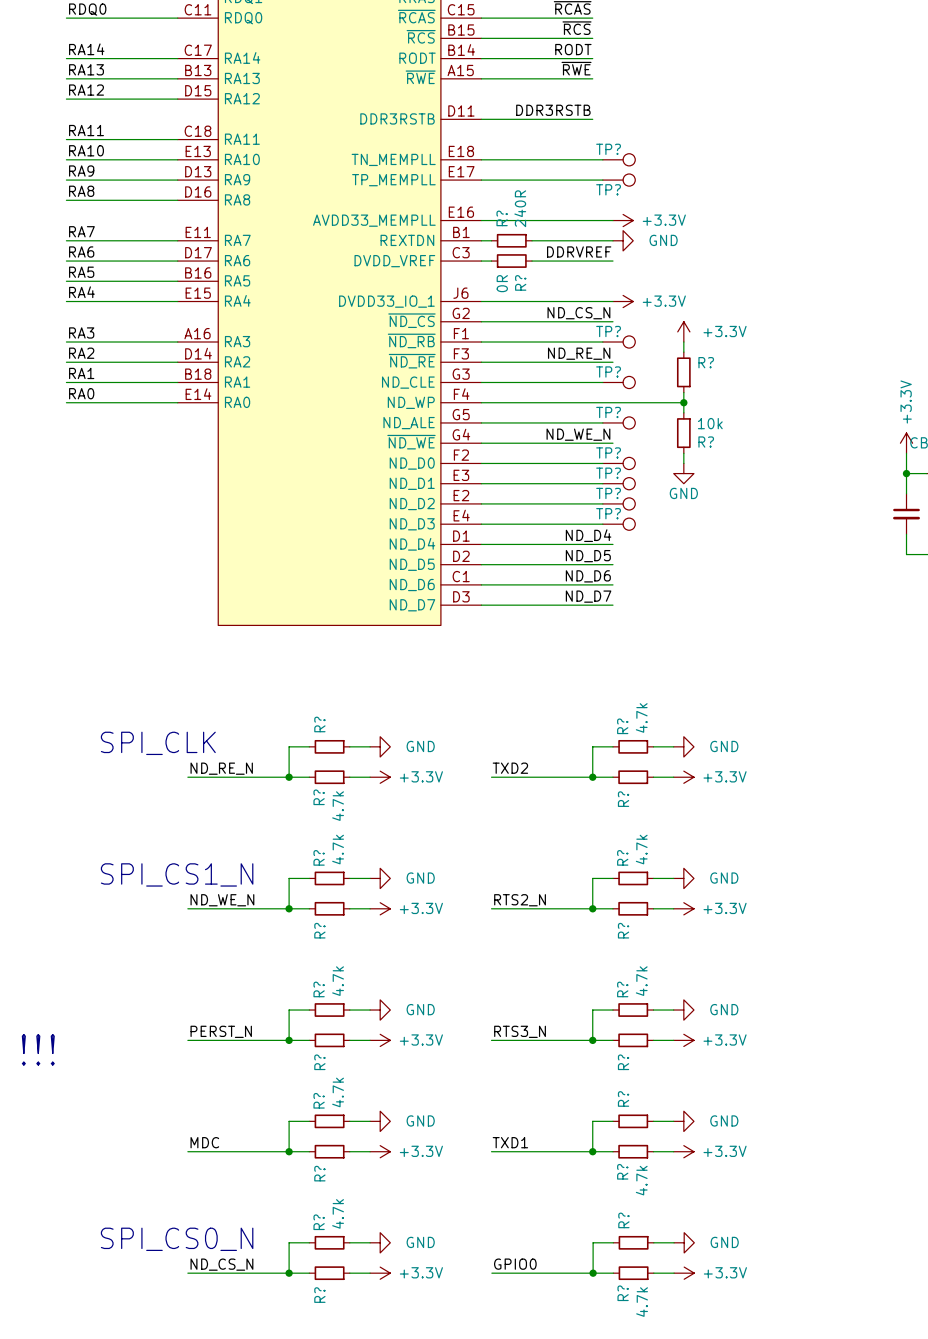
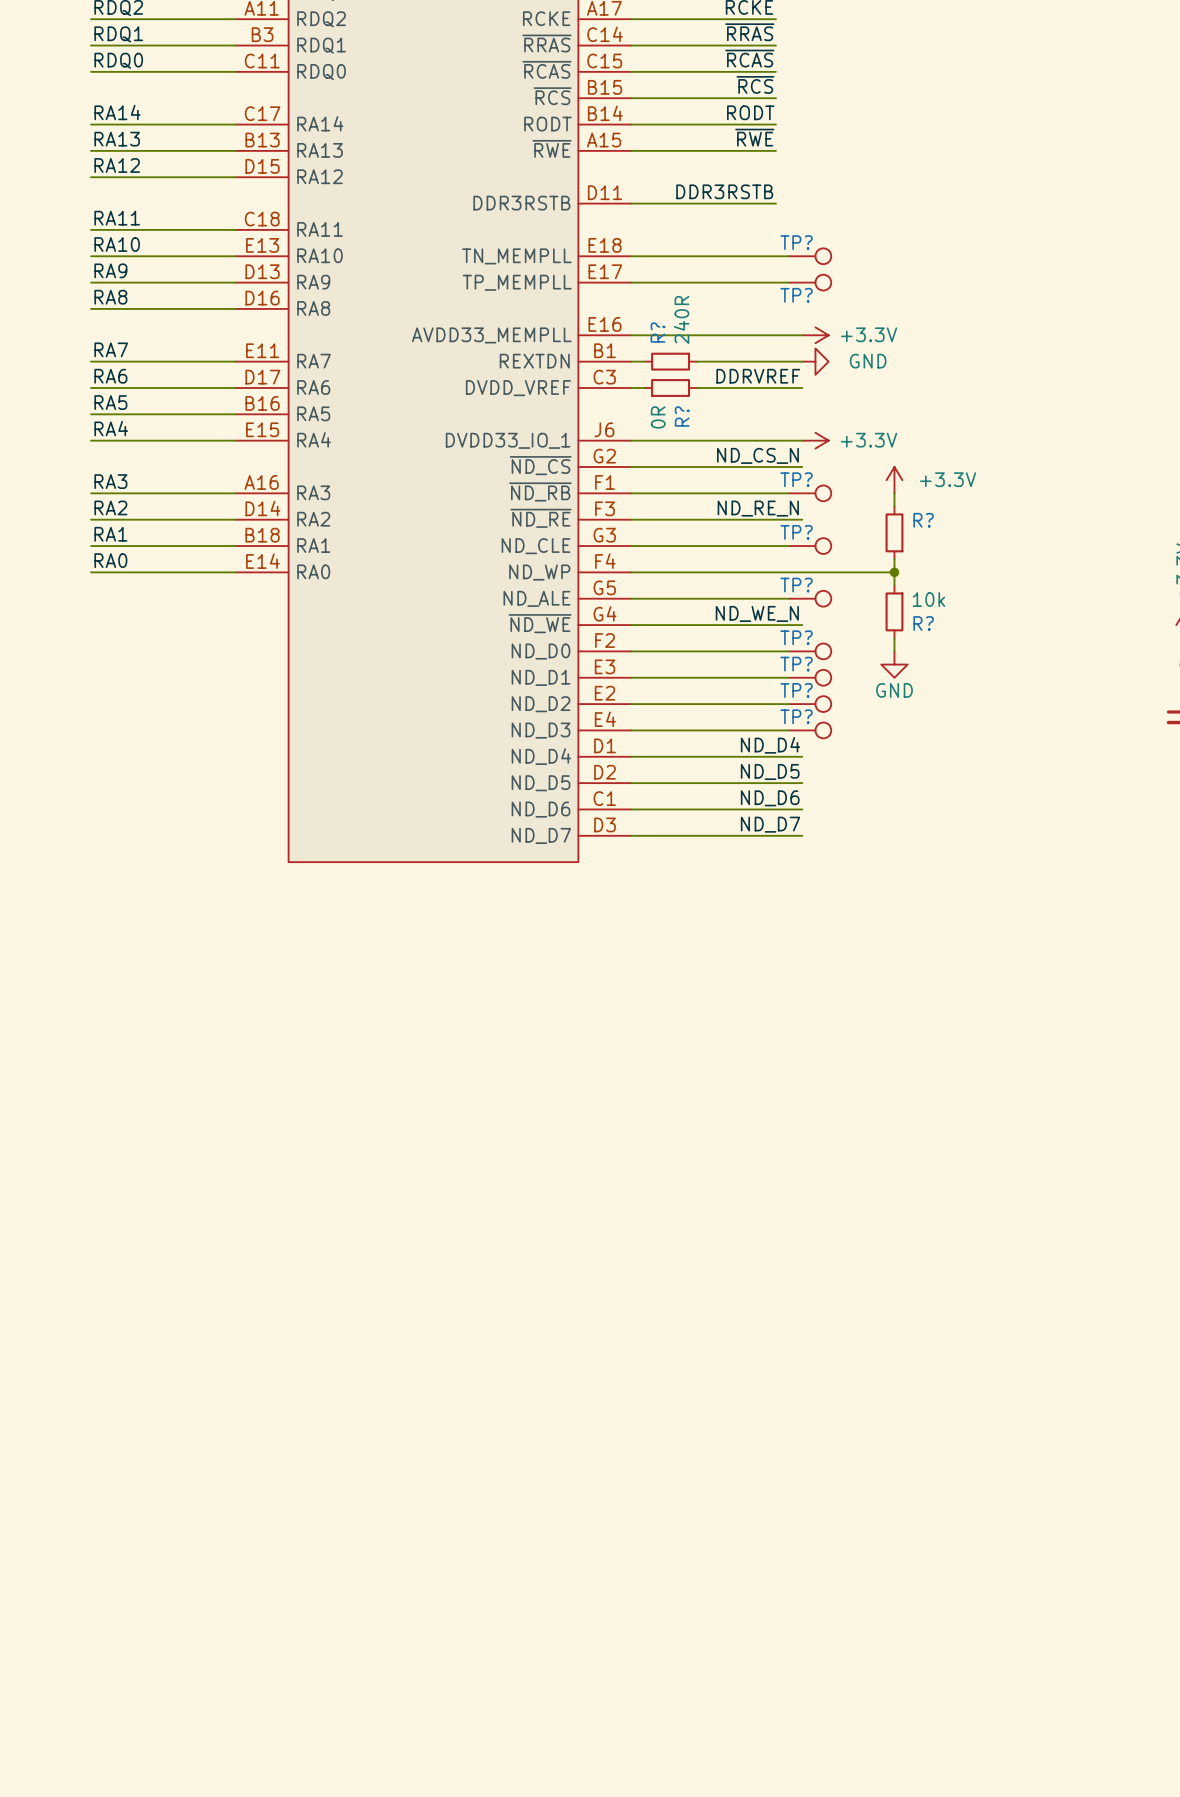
text: SPI_CLK (158, 743) -> none
wire: (309, 746) (289, 746) (289, 777) -> none
R?: (329, 746) -> none
wire: (349, 746) (370, 746) -> none
power symbol: GND (380, 746) -> none
wire: (612, 746) (592, 746) (592, 777) -> none
R?: 4.7k (633, 746) -> none
wire: (653, 746) (673, 746) -> none
power symbol: GND (683, 746) -> none
label: ND_RE_N (221, 768) -> none
label: TXD2 (510, 768) -> none
wire: (187, 777) (309, 777) -> none
junction: (289, 777) -> none
R?: 4.7k (329, 777) -> none
wire: (349, 777) (370, 777) -> none
power symbol: +3.3V (380, 777) -> none
wire: (491, 777) (612, 777) -> none
junction: (592, 777) -> none
R?: (633, 777) -> none
wire: (653, 777) (673, 777) -> none
power symbol: +3.3V (683, 777) -> none
text: SPI_CS1_N (177, 874) -> none
wire: (309, 878) (289, 878) (289, 908) -> none
R?: 4.7k (329, 878) -> none
wire: (349, 878) (370, 878) -> none
power symbol: GND (380, 878) -> none
wire: (612, 878) (592, 878) (592, 908) -> none
R?: 4.7k (633, 878) -> none
wire: (653, 878) (673, 878) -> none
power symbol: GND (683, 878) -> none
label: ND_WE_N (222, 900) -> none
label: RTS2_N (520, 900) -> none
wire: (187, 908) (309, 908) -> none
junction: (289, 908) -> none
R?: (329, 908) -> none
wire: (349, 908) (370, 908) -> none
power symbol: +3.3V (380, 908) -> none
wire: (491, 908) (612, 908) -> none
junction: (592, 908) -> none
R?: (633, 908) -> none
wire: (653, 908) (673, 908) -> none
power symbol: +3.3V (683, 908) -> none
wire: (309, 1010) (289, 1010) (289, 1040) -> none
R?: 4.7k (329, 1010) -> none
wire: (349, 1010) (370, 1010) -> none
power symbol: GND (380, 1010) -> none
wire: (612, 1010) (592, 1010) (592, 1040) -> none
R?: 4.7k (633, 1010) -> none
wire: (653, 1010) (673, 1010) -> none
power symbol: GND (683, 1010) -> none
label: PERST_N (221, 1031) -> none
label: RTS3_N (520, 1031) -> none
wire: (187, 1040) (309, 1040) -> none
junction: (289, 1040) -> none
R?: (329, 1040) -> none
wire: (349, 1040) (370, 1040) -> none
power symbol: +3.3V (380, 1040) -> none
wire: (491, 1040) (612, 1040) -> none
junction: (592, 1040) -> none
R?: (633, 1040) -> none
wire: (653, 1040) (673, 1040) -> none
power symbol: +3.3V (683, 1040) -> none
text: !!! (38, 1049) -> none
wire: (309, 1121) (289, 1121) (289, 1151) -> none
R?: 4.7k (329, 1121) -> none
wire: (349, 1121) (370, 1121) -> none
power symbol: GND (380, 1121) -> none
wire: (612, 1121) (592, 1121) (592, 1151) -> none
R?: (633, 1121) -> none
wire: (653, 1121) (673, 1121) -> none
power symbol: GND (683, 1121) -> none
label: MDC (204, 1142) -> none
label: TXD1 (510, 1142) -> none
wire: (187, 1151) (309, 1151) -> none
junction: (289, 1151) -> none
R?: (329, 1151) -> none
wire: (349, 1151) (370, 1151) -> none
power symbol: +3.3V (380, 1151) -> none
wire: (491, 1151) (612, 1151) -> none
junction: (592, 1151) -> none
R?: 4.7k (633, 1151) -> none
wire: (653, 1151) (673, 1151) -> none
power symbol: +3.3V (683, 1151) -> none
text: SPI_CS0_N (177, 1239) -> none
wire: (309, 1242) (289, 1242) (289, 1273) -> none
R?: 4.7k (329, 1242) -> none
wire: (349, 1242) (370, 1242) -> none
power symbol: GND (380, 1242) -> none
wire: (613, 1242) (593, 1242) (593, 1273) -> none
R?: (633, 1242) -> none
wire: (653, 1242) (674, 1242) -> none
power symbol: GND (684, 1242) -> none
label: ND_CS_N (221, 1264) -> none
label: GPIO0 (515, 1264) -> none
wire: (187, 1273) (309, 1273) -> none
junction: (289, 1273) -> none
R?: (329, 1273) -> none
wire: (349, 1273) (370, 1273) -> none
power symbol: +3.3V (380, 1273) -> none
wire: (491, 1273) (613, 1273) -> none
junction: (593, 1273) -> none
R?: 4.7k (633, 1273) -> none
wire: (653, 1273) (674, 1273) -> none
power symbol: +3.3V (684, 1273) -> none

